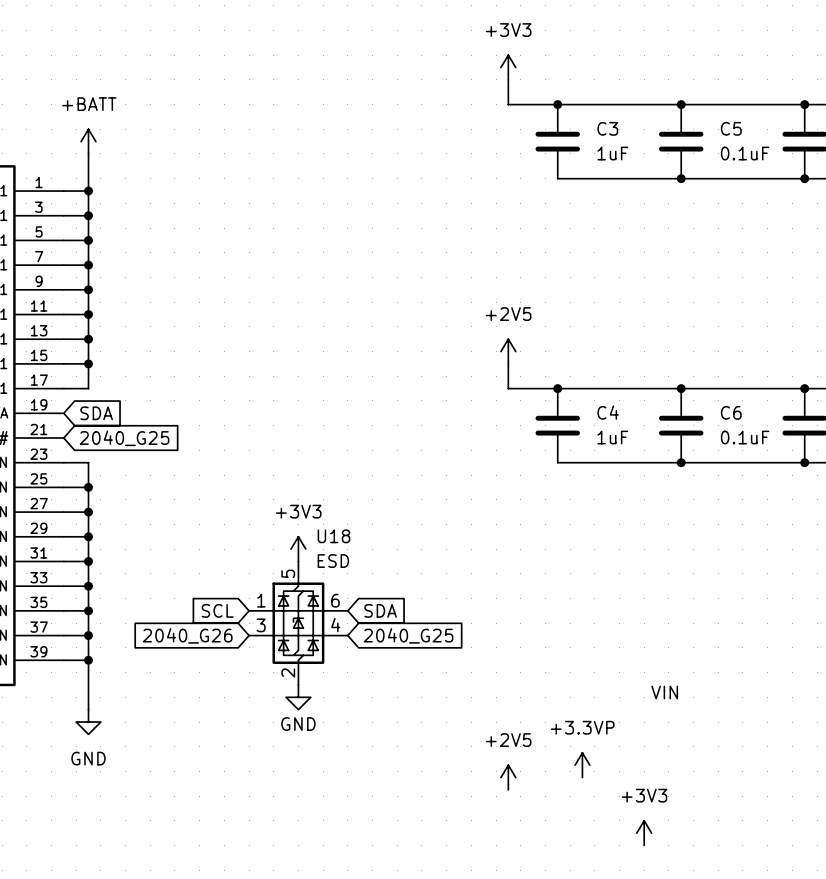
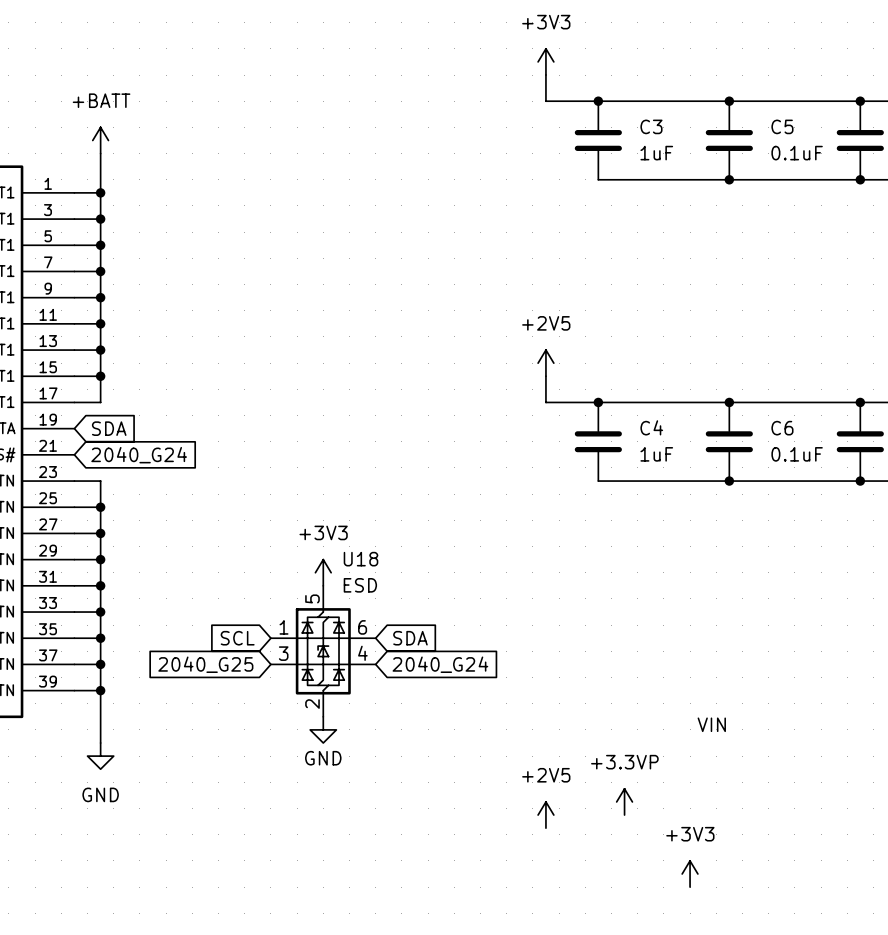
global label: 2040_G25 (124, 438) -> 2040_G24 (139, 455)
global label: 2040_G26 (187, 635) -> 2040_G25 (205, 664)
global label: 2040_G25 (408, 635) -> 2040_G24 (440, 664)

